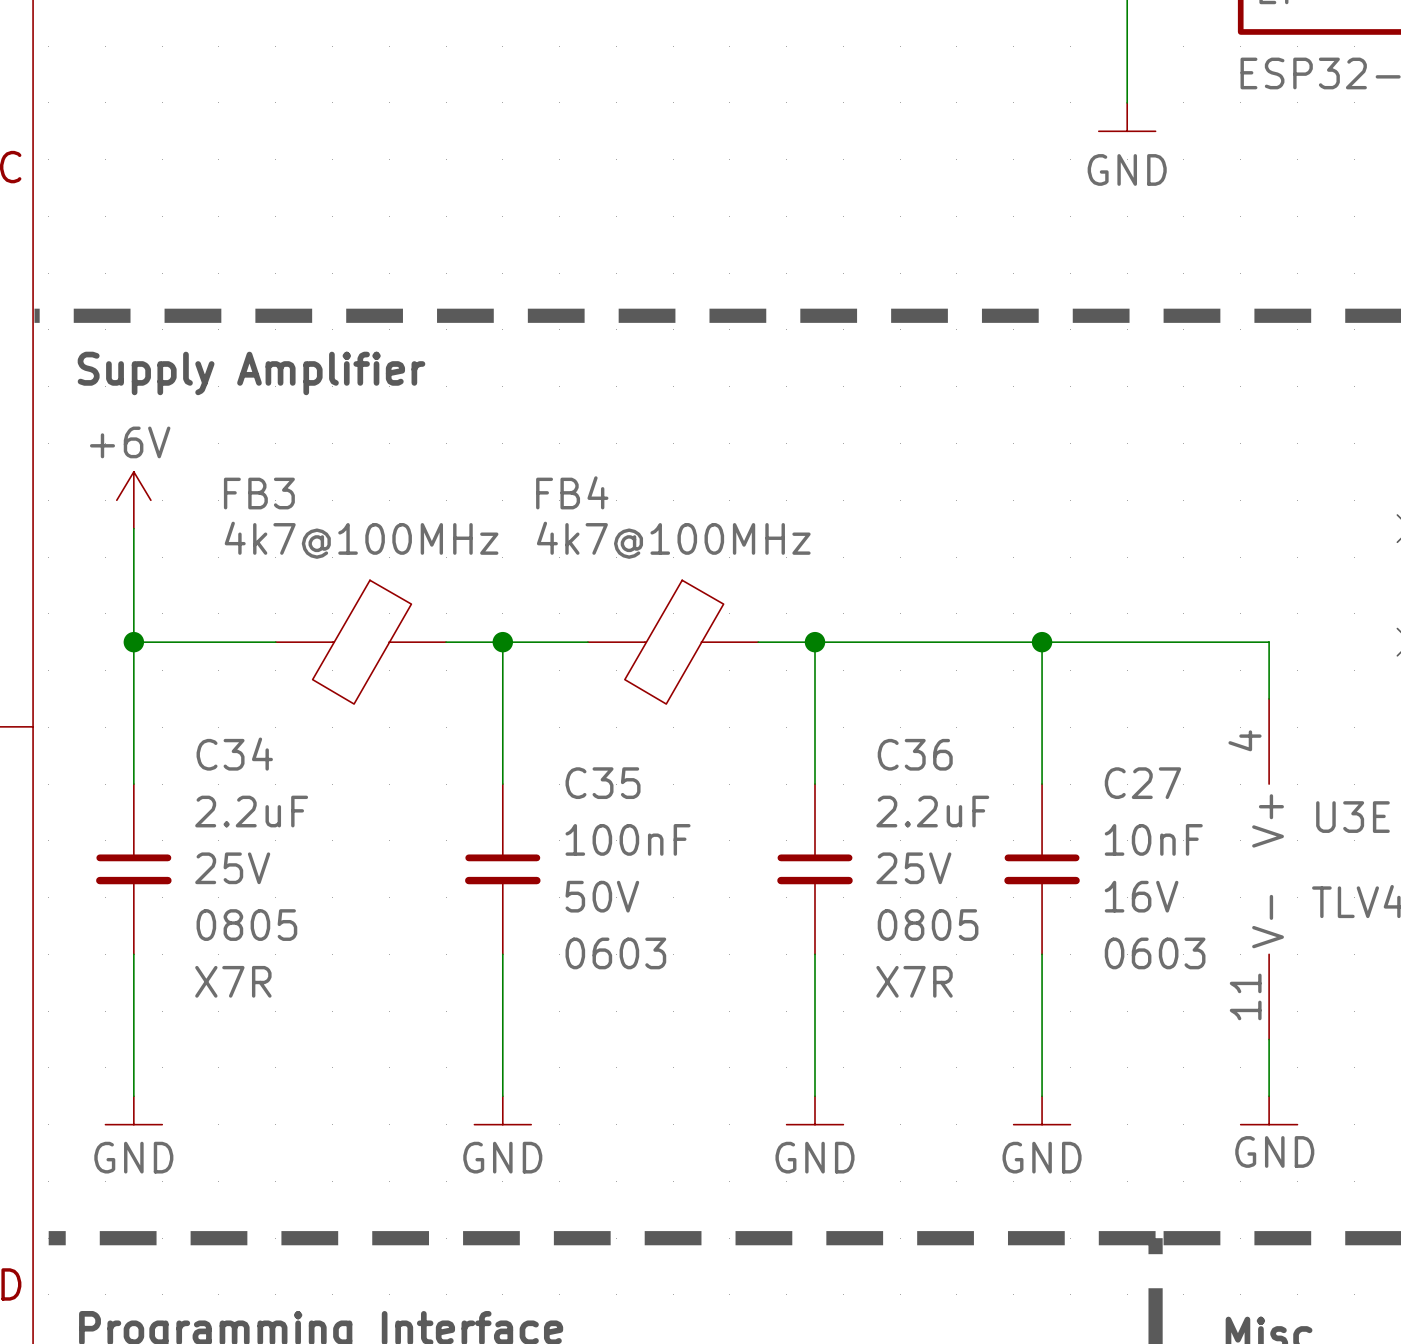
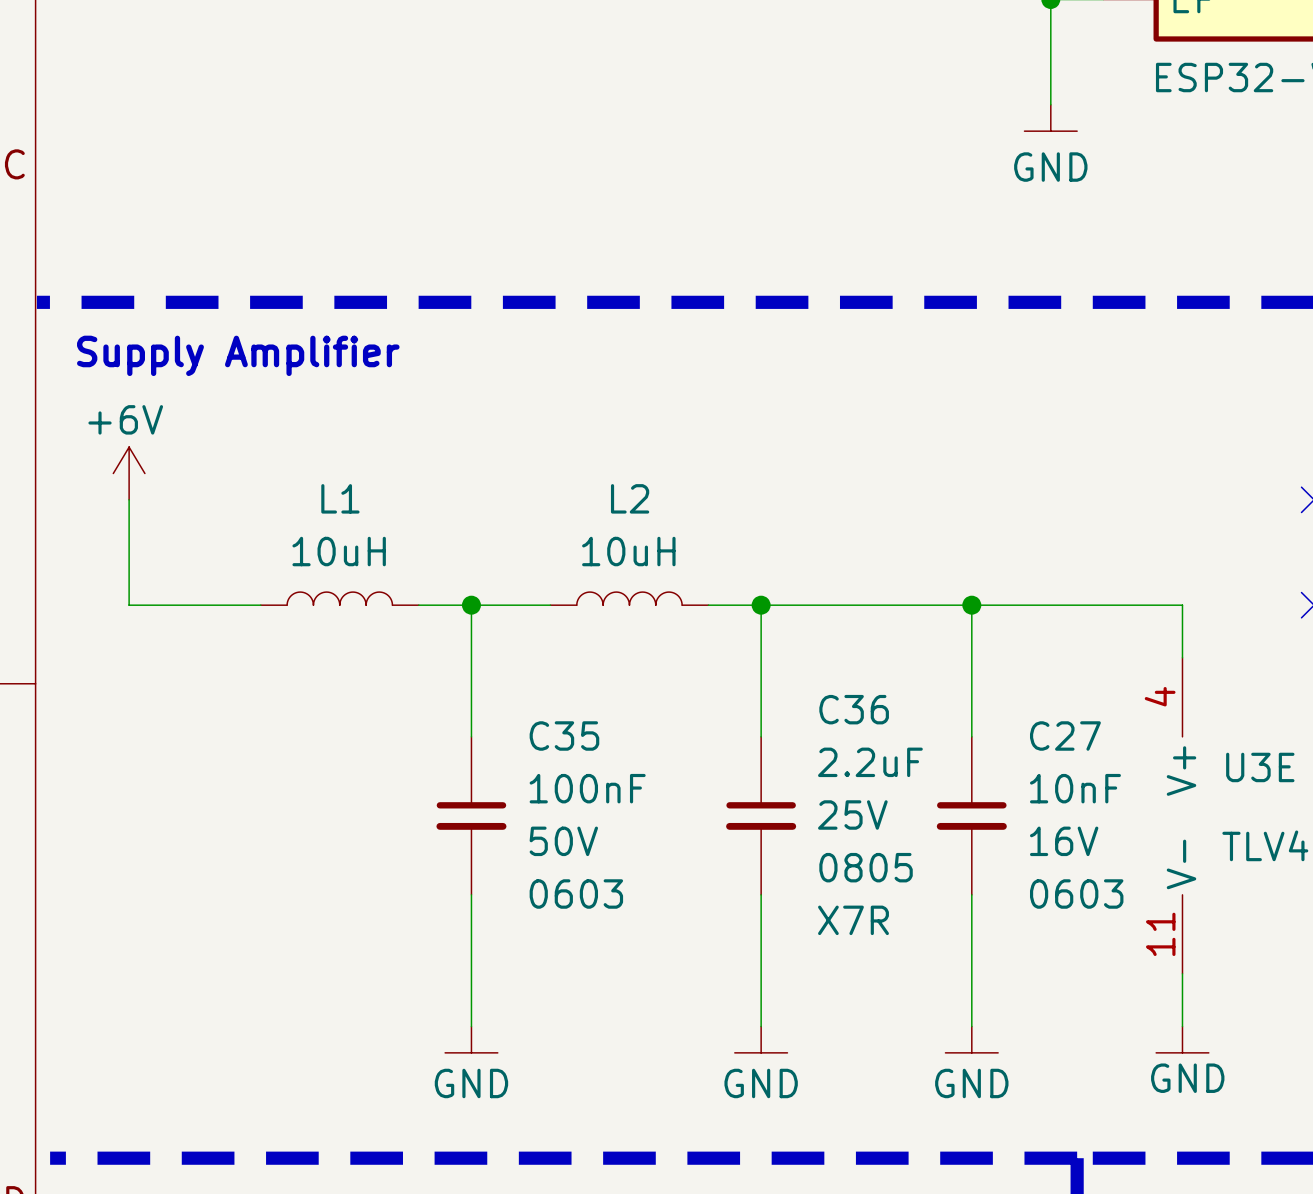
L1: none -> 10uH (339, 598)
L2: none -> 10uH (629, 598)
wire: (133, 642) (133, 784) -> none
junction: (133, 642) -> none
FB3: 4k7@100MHz (360, 642) -> none
FB4: 4k7@100MHz (673, 642) -> none
C34: 2.2uF (133, 869) -> none
wire: (133, 954) (133, 1096) -> none
power symbol: GND (133, 1110) -> none

